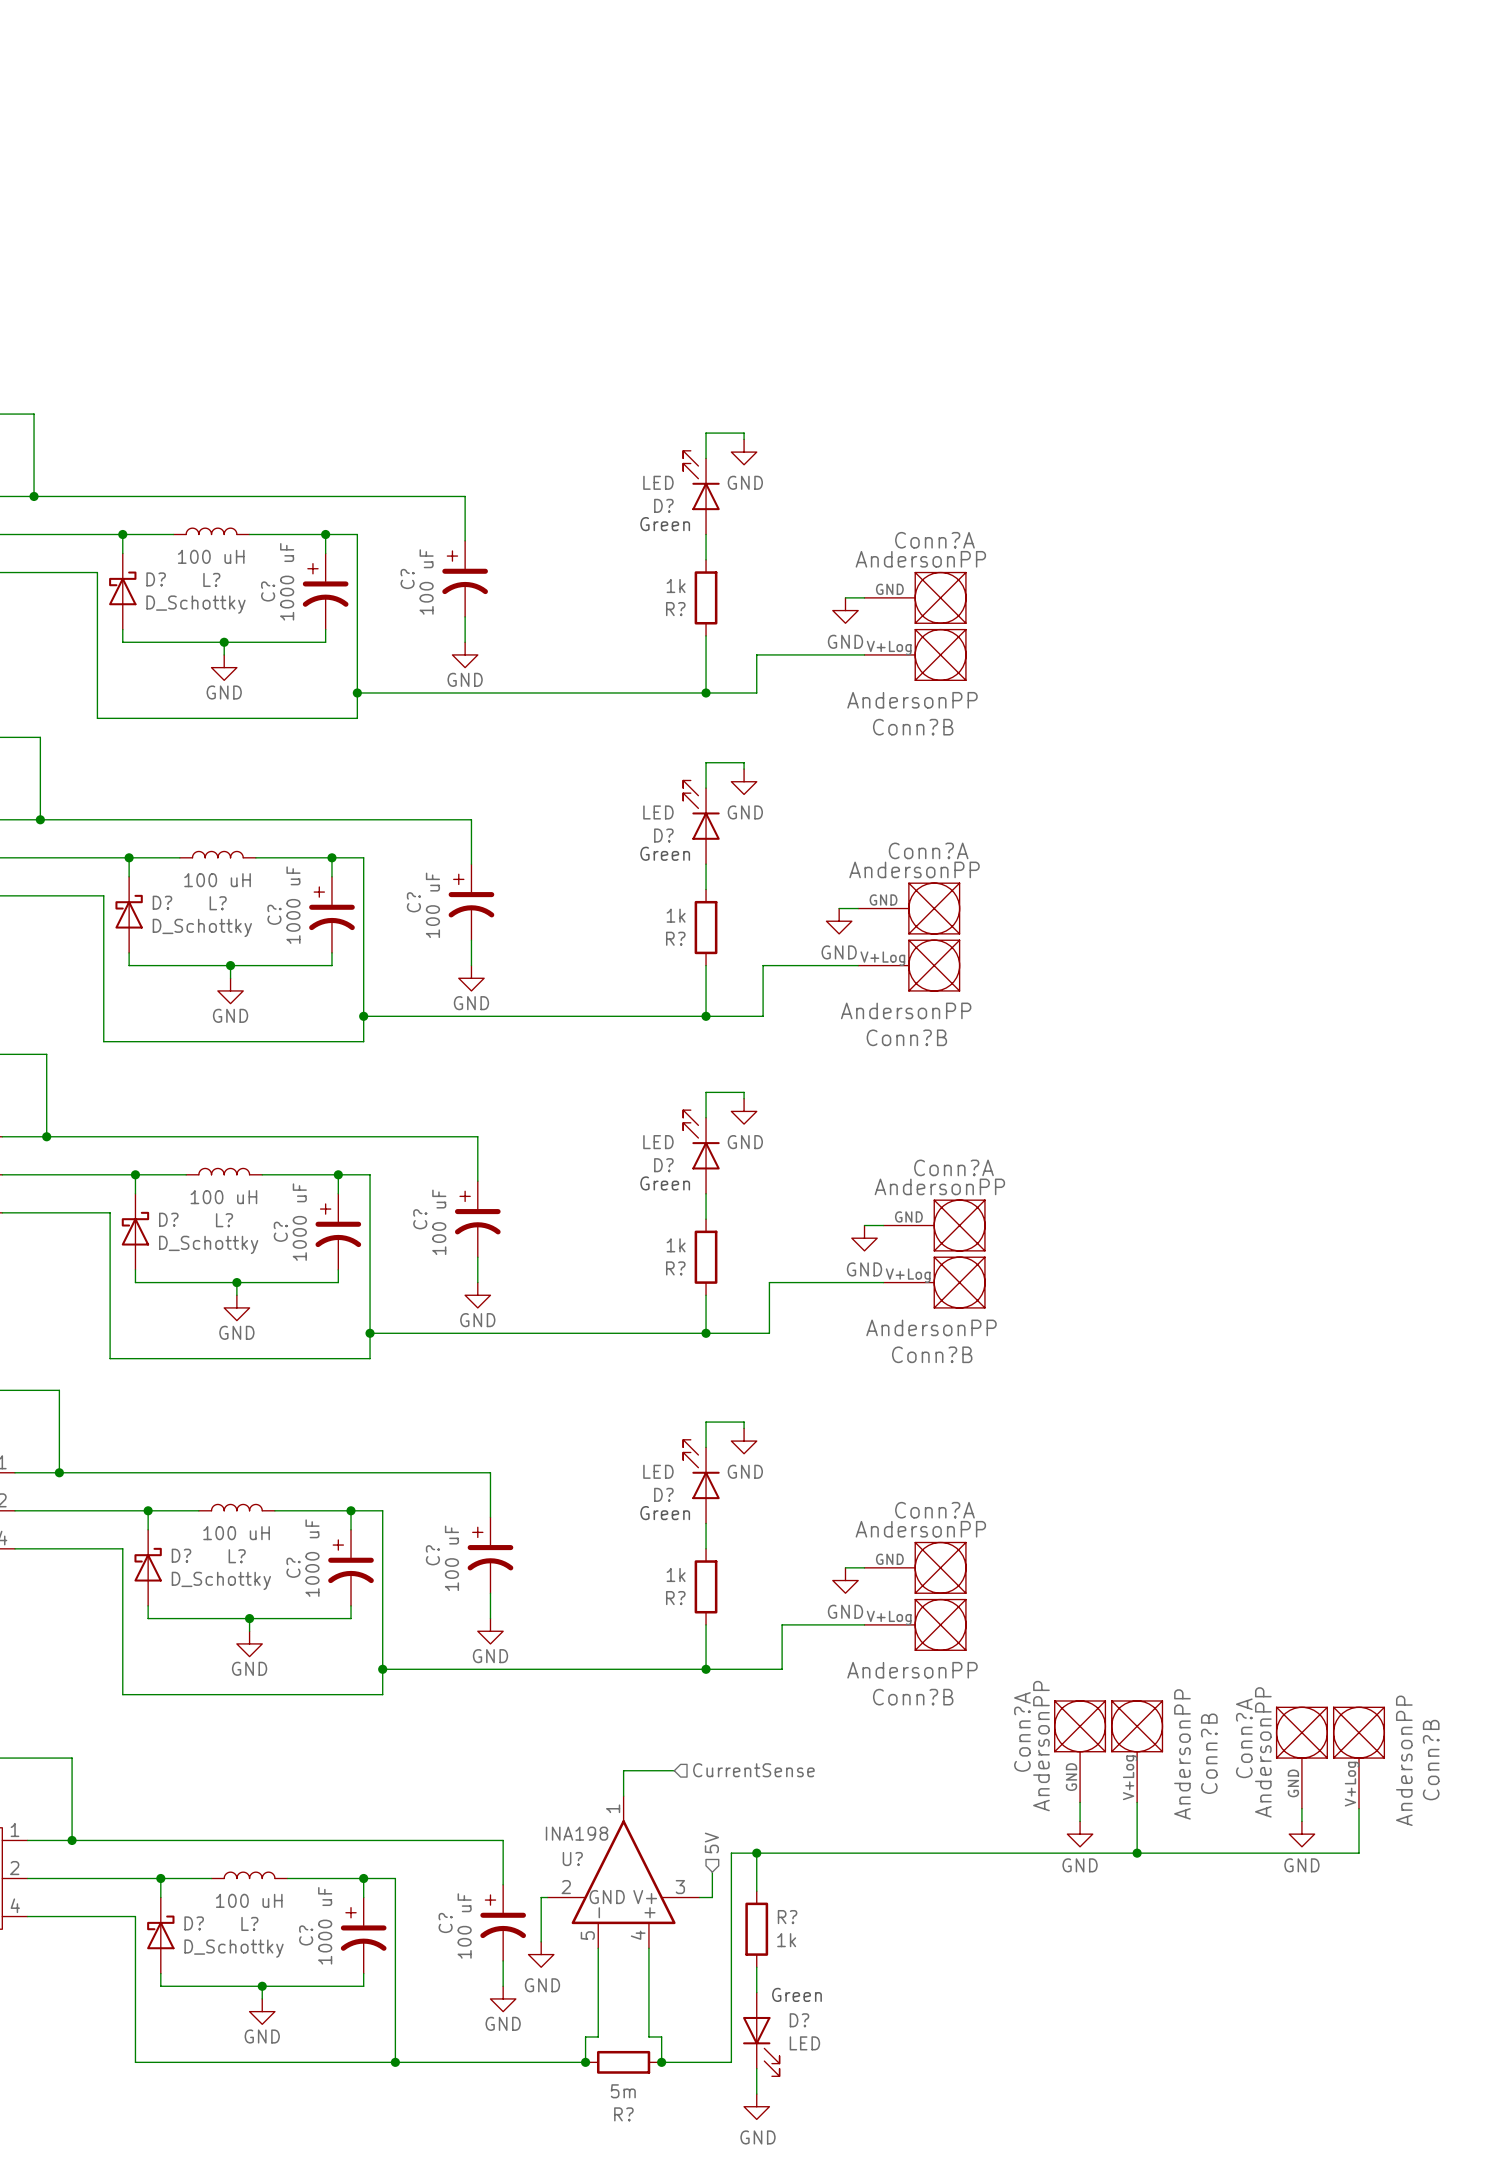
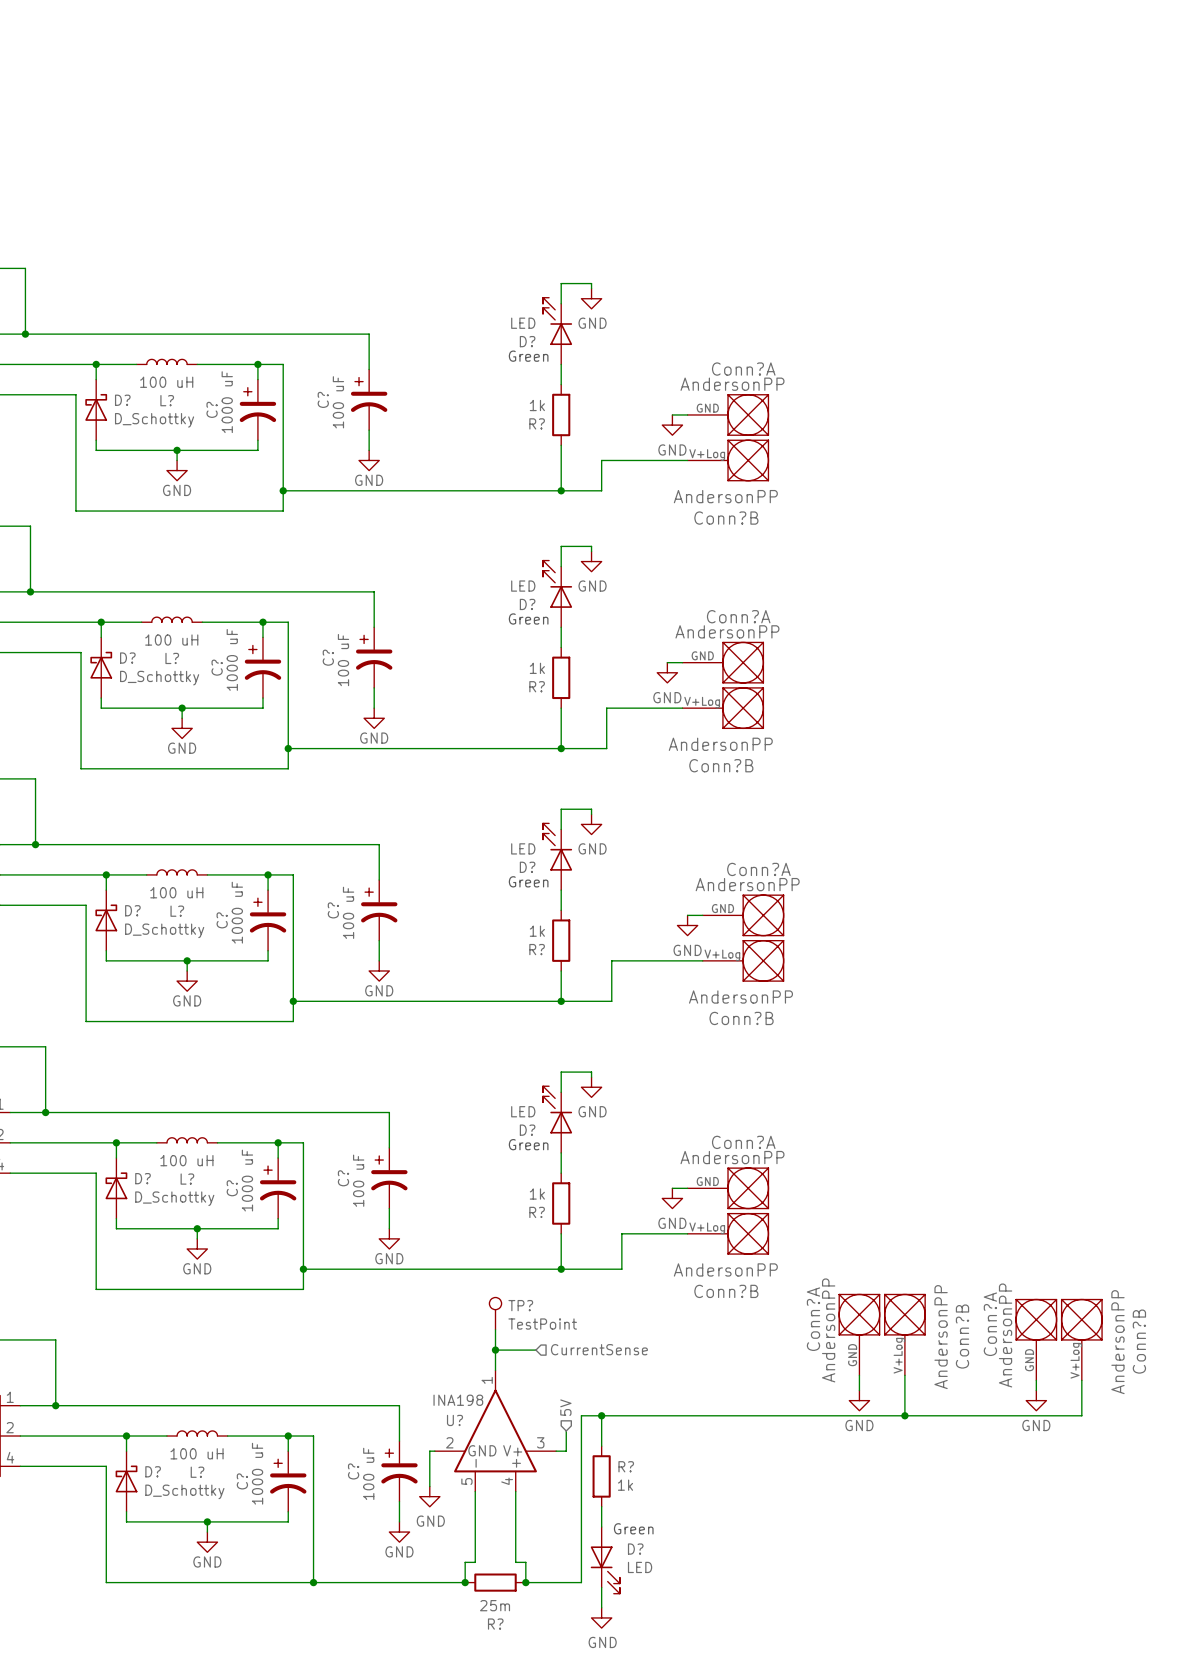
TP?: none -> TestPoint (495, 1313)
wire: none -> (495, 1329) (495, 1350)
junction: none -> (495, 1350)
R? value: 5m (623, 2091) -> 25m (495, 1605)

